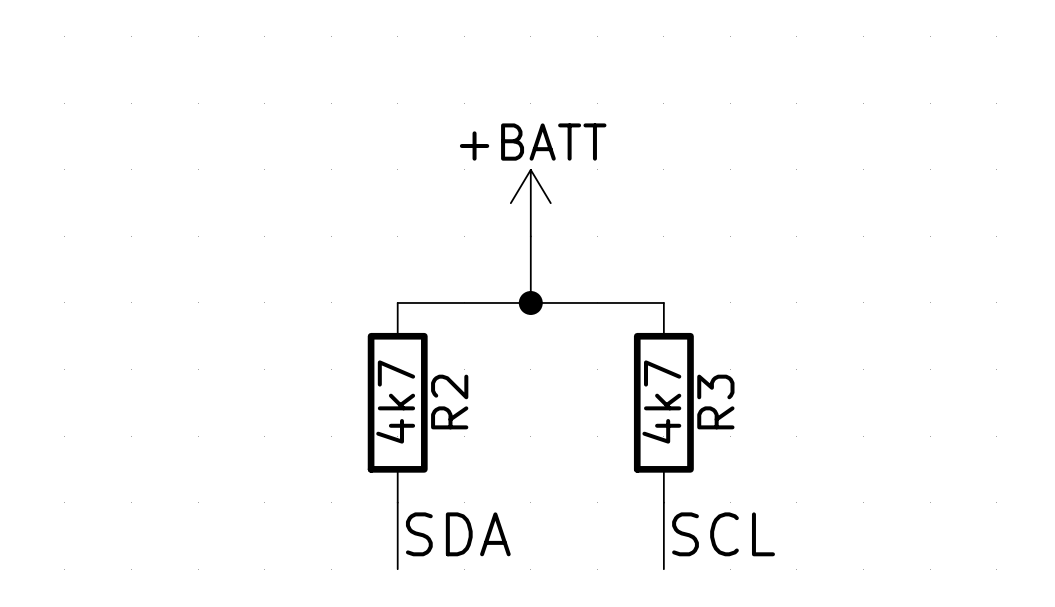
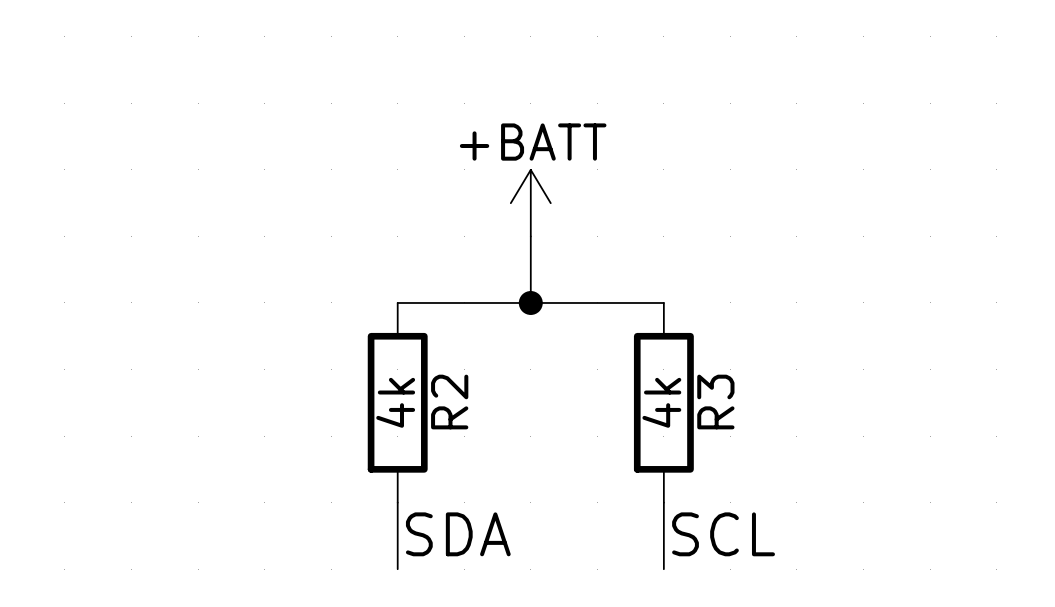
R2 value: 4k7 (395, 402) -> 4k (395, 402)
R3 value: 4k7 (661, 402) -> 4k (661, 402)

